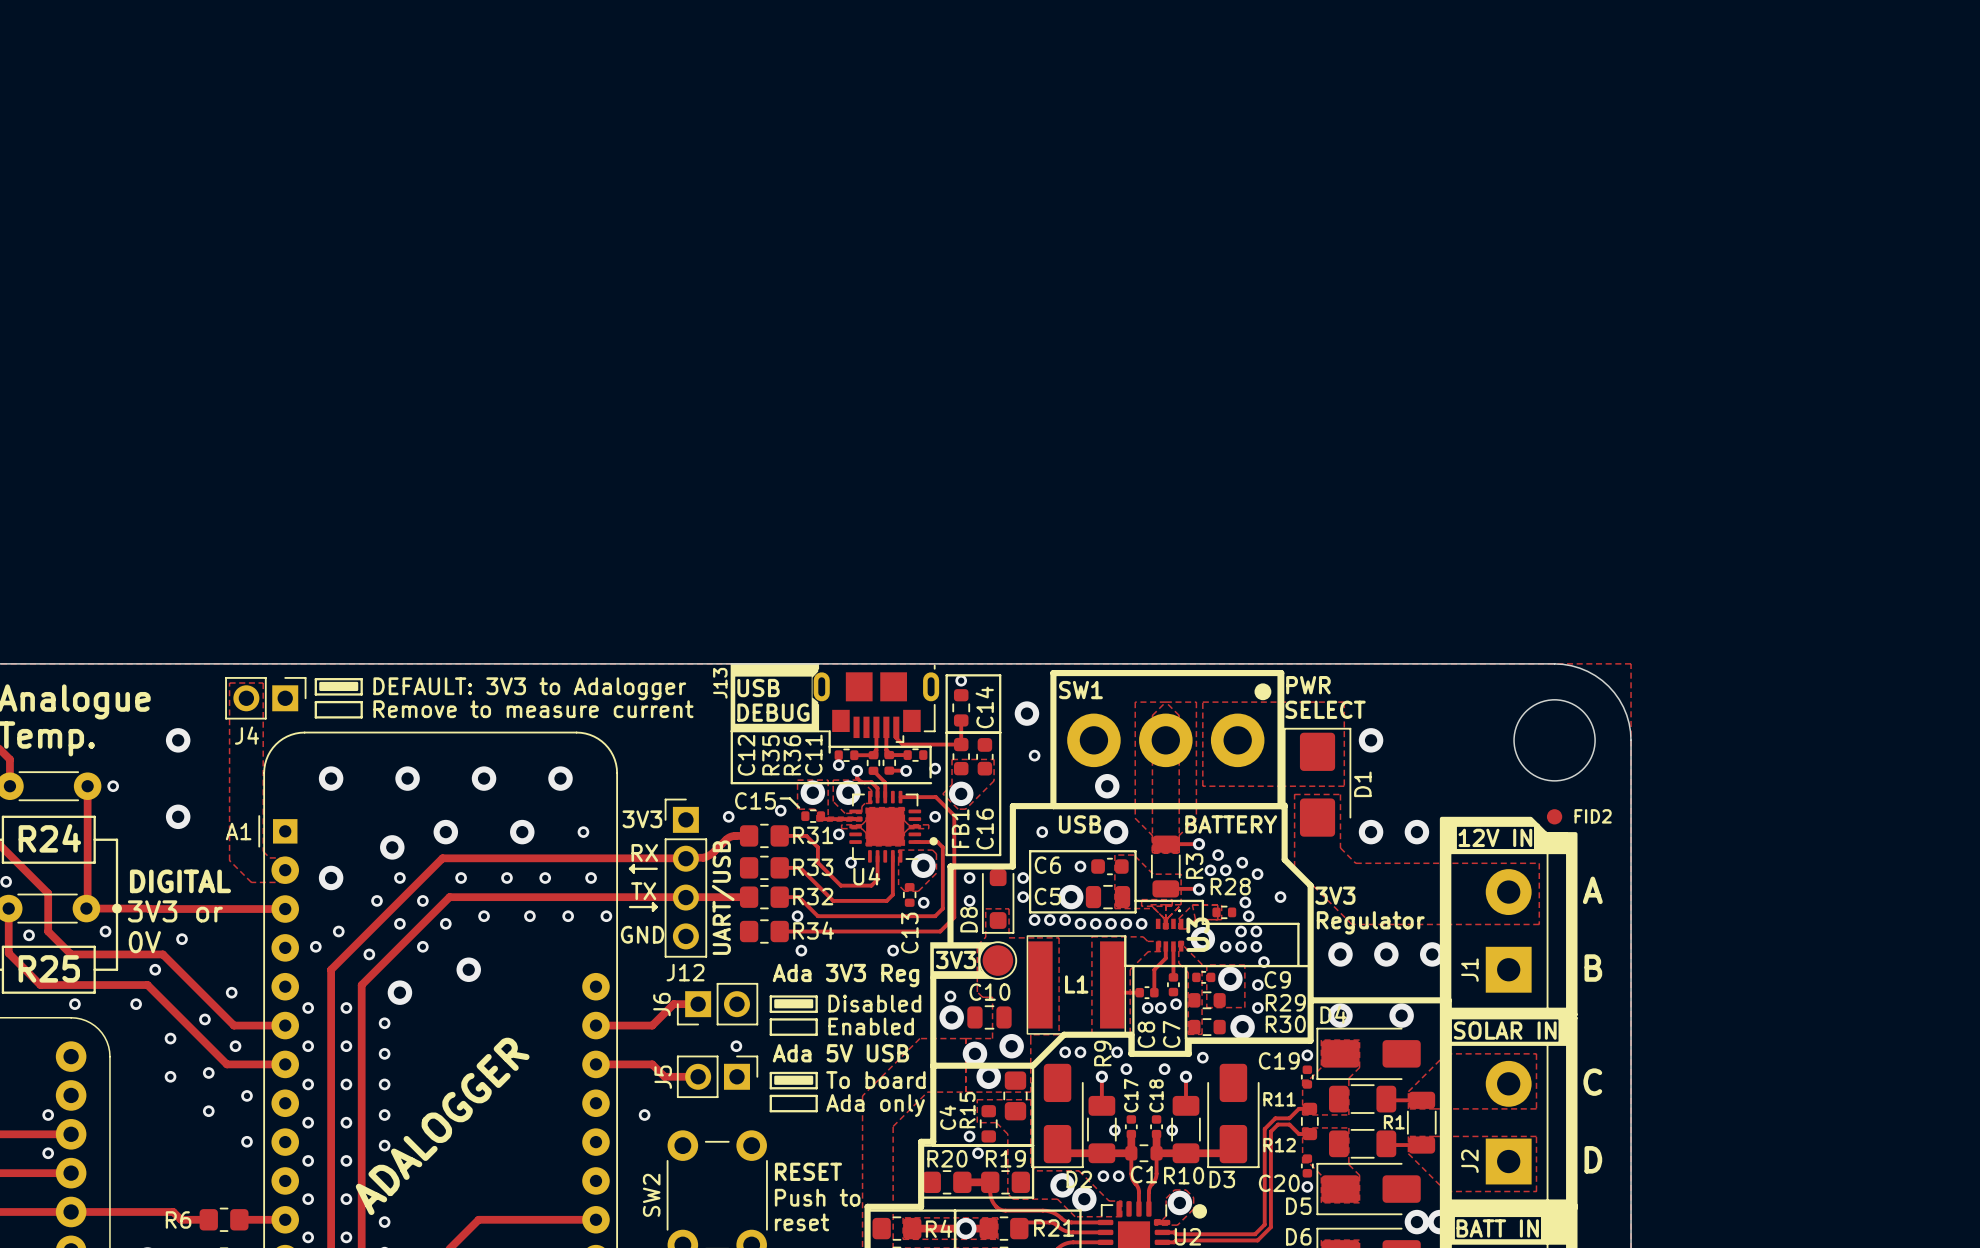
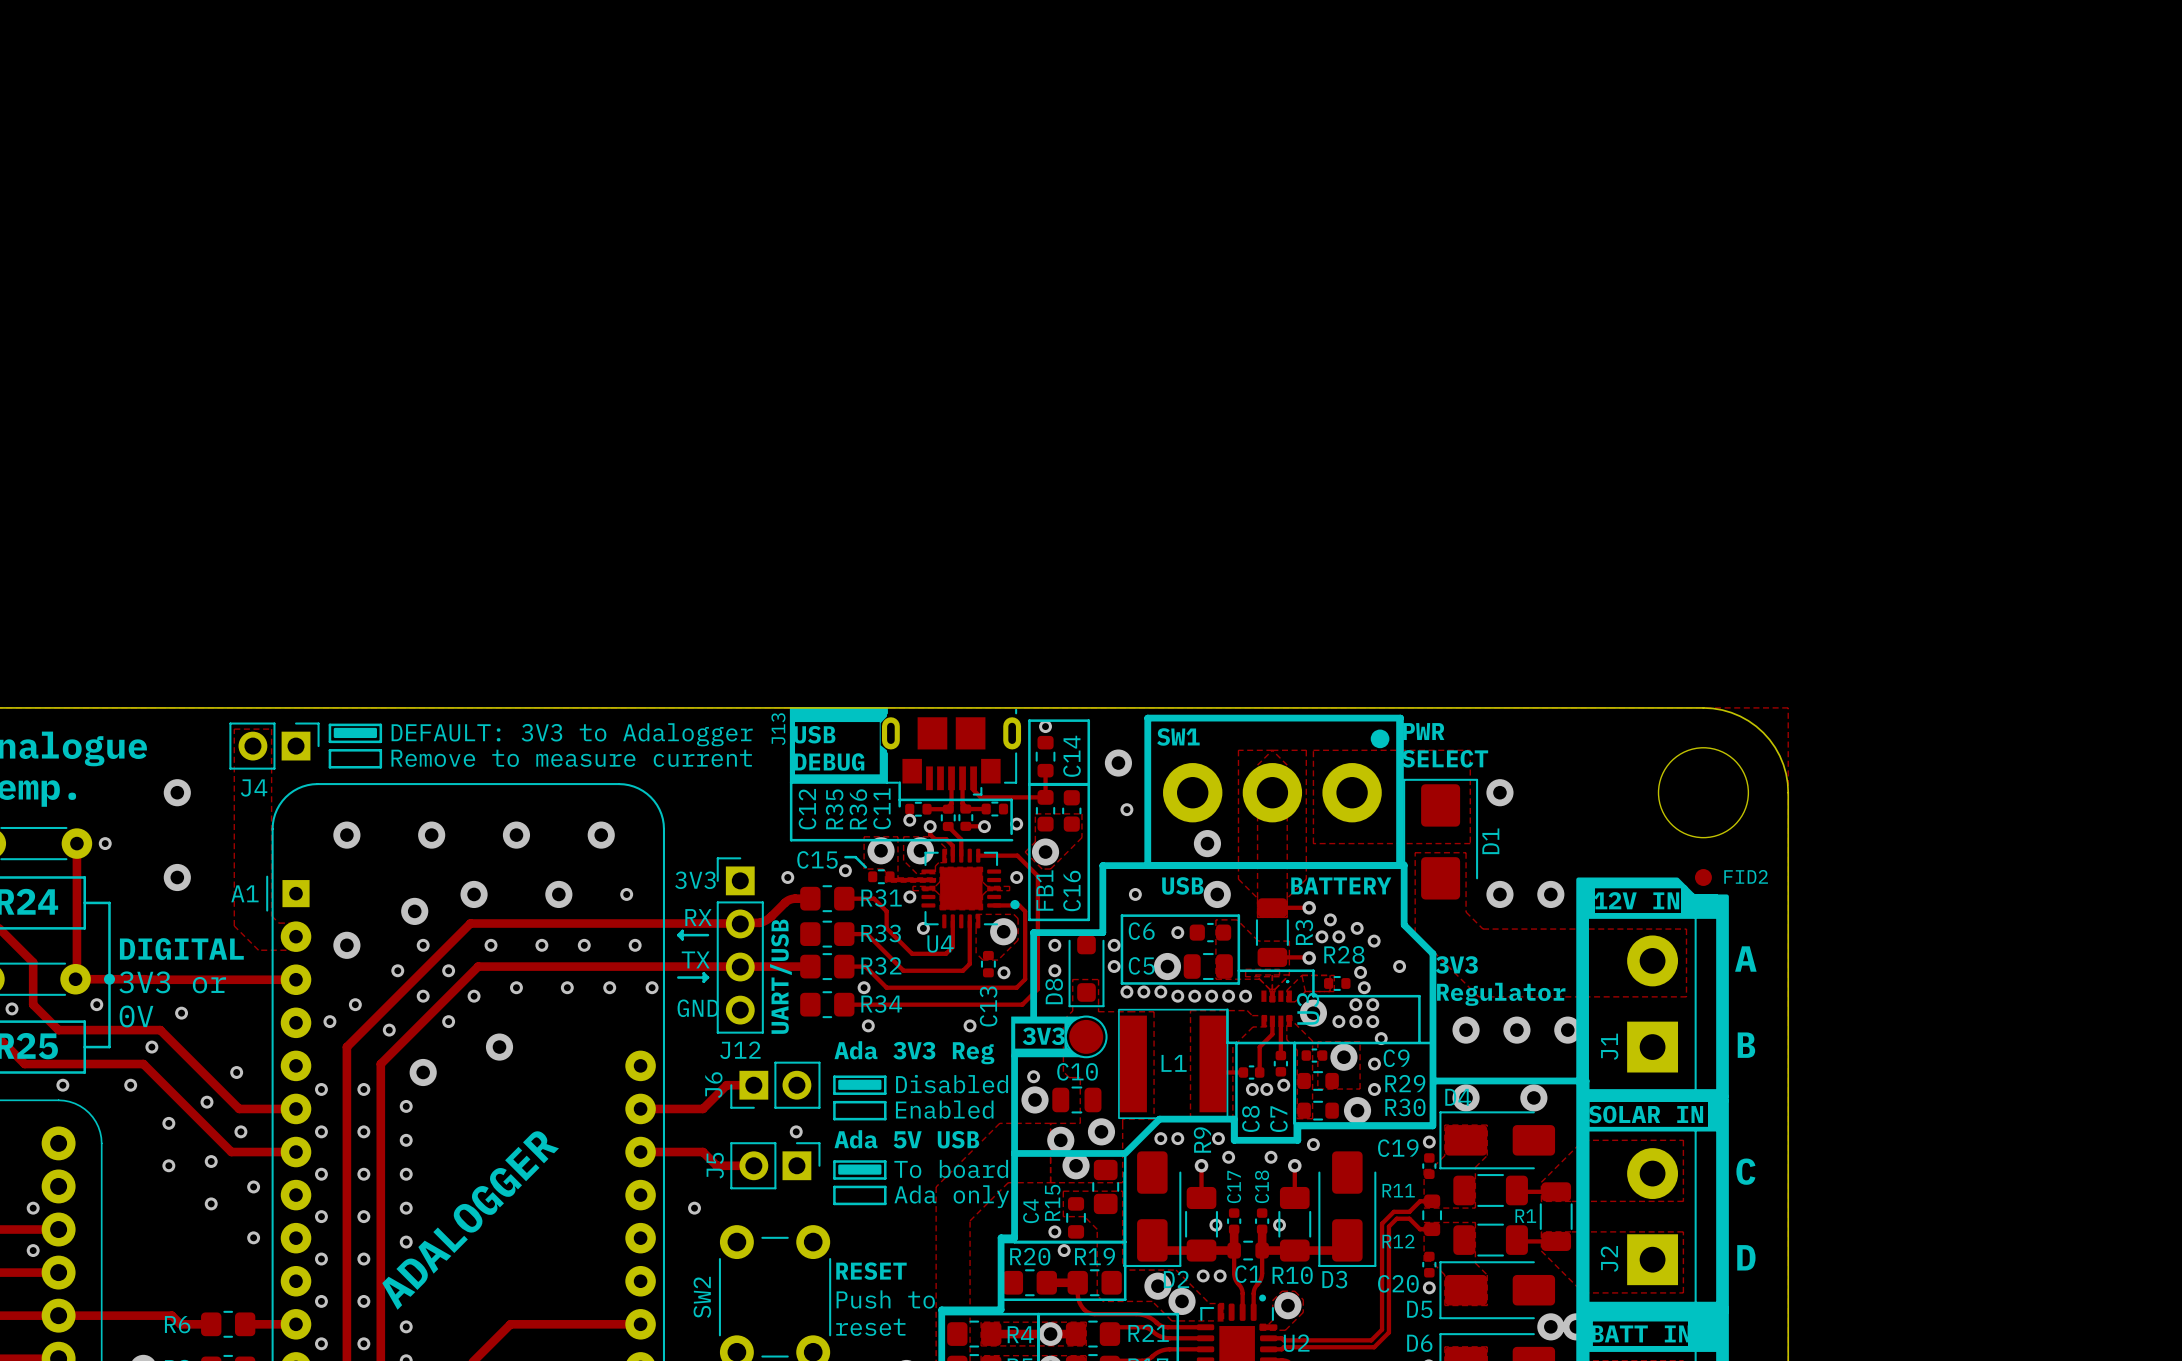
drawing: none -> [1259, 1294, 1267, 1302]
drawing: [1192, 1204, 1208, 1219] -> none

